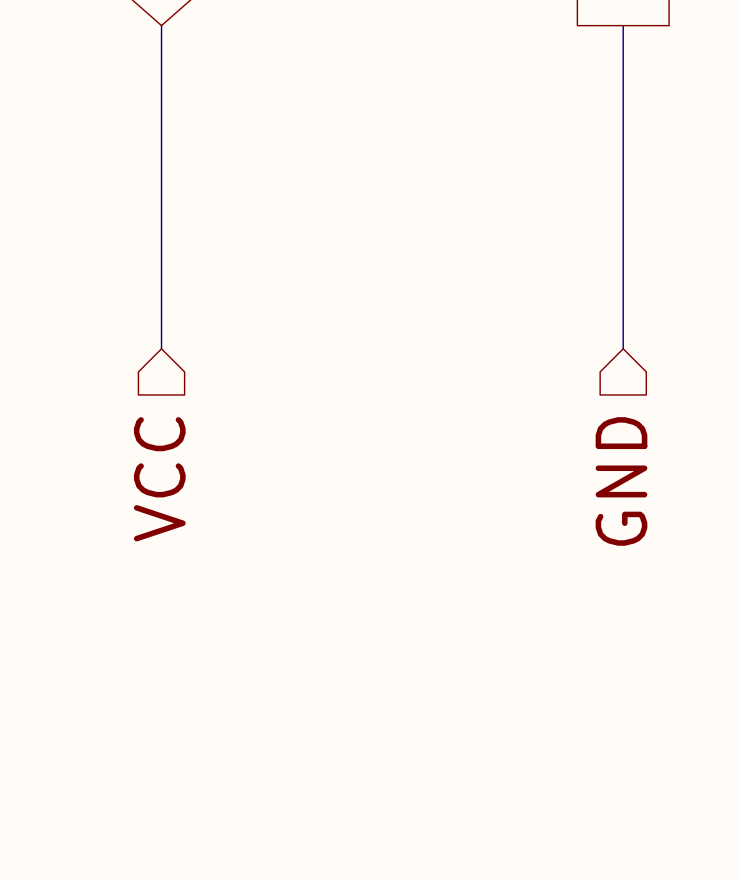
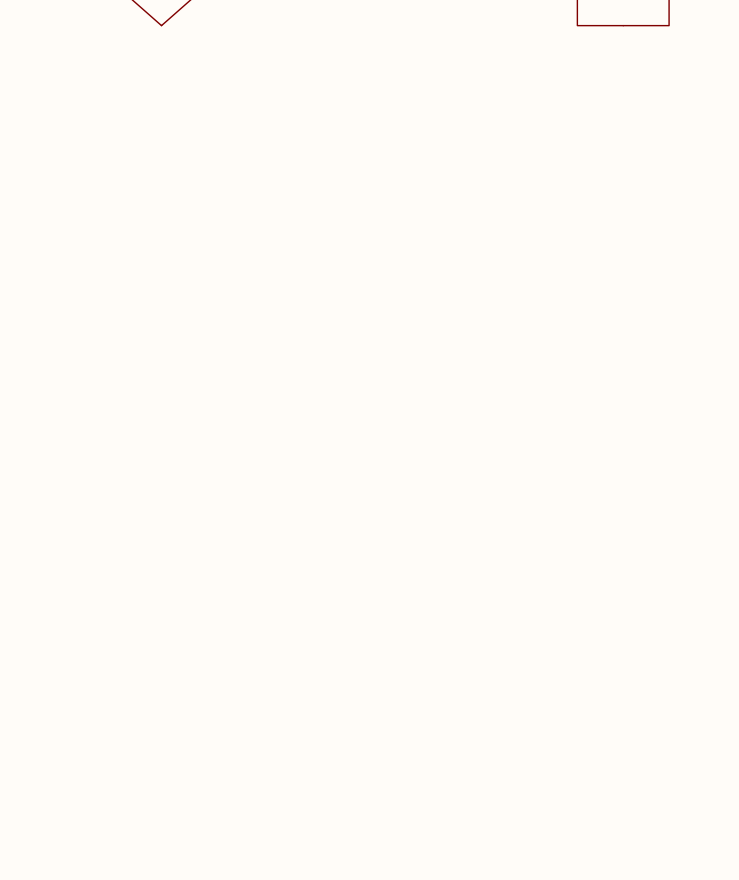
wire: (161, 25) (161, 348) -> none
wire: (623, 25) (623, 348) -> none
hierarchical label: VCC (159, 479) -> none
hierarchical label: GND (621, 481) -> none

